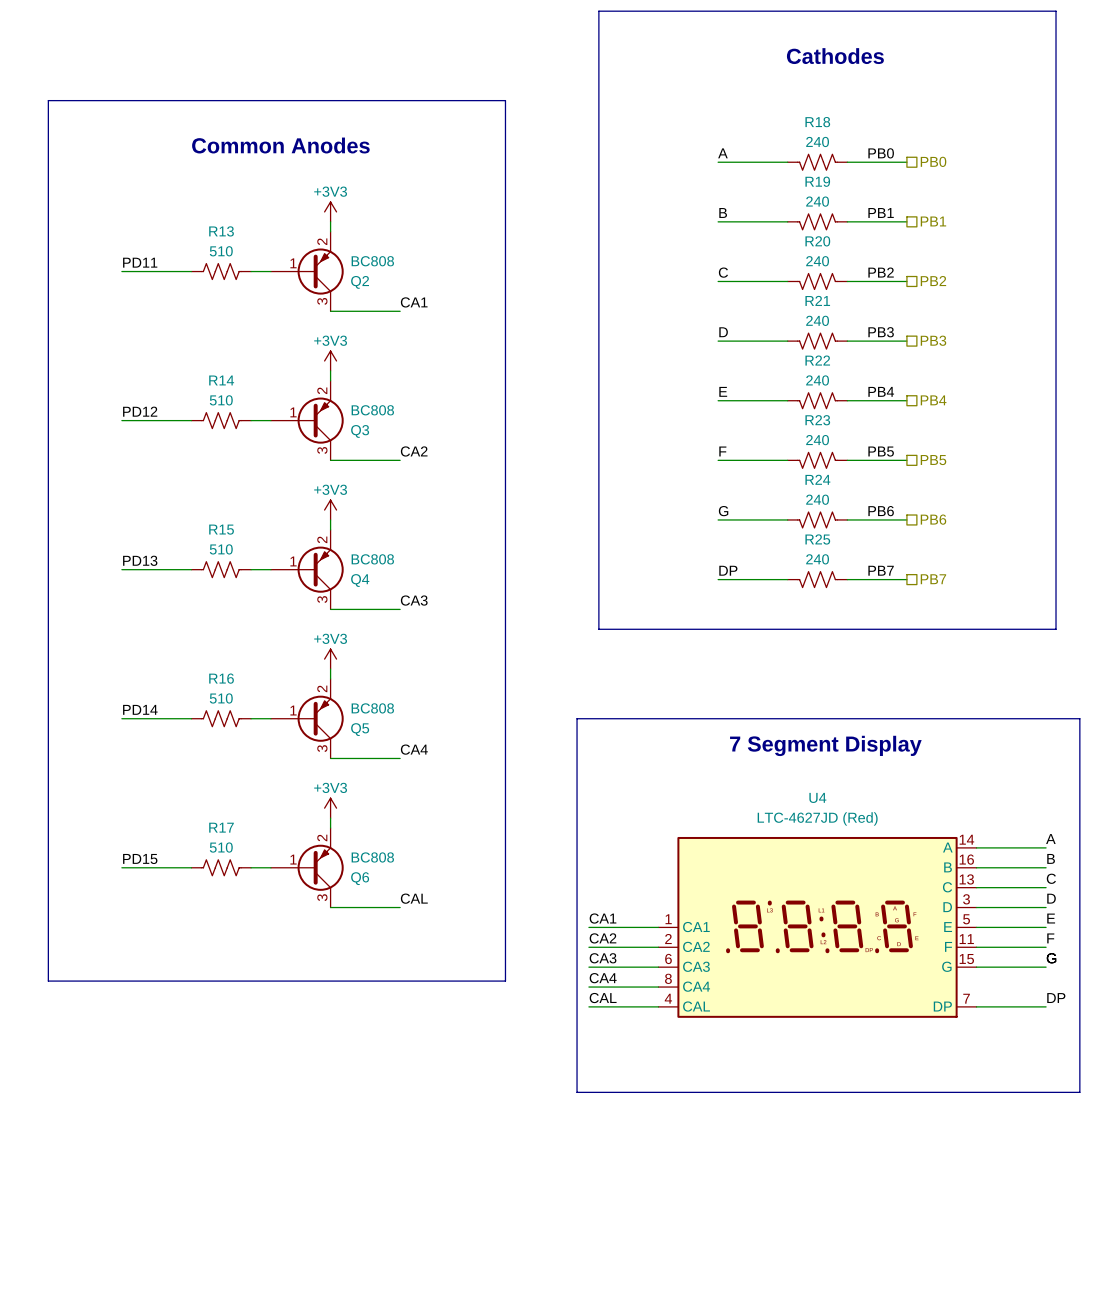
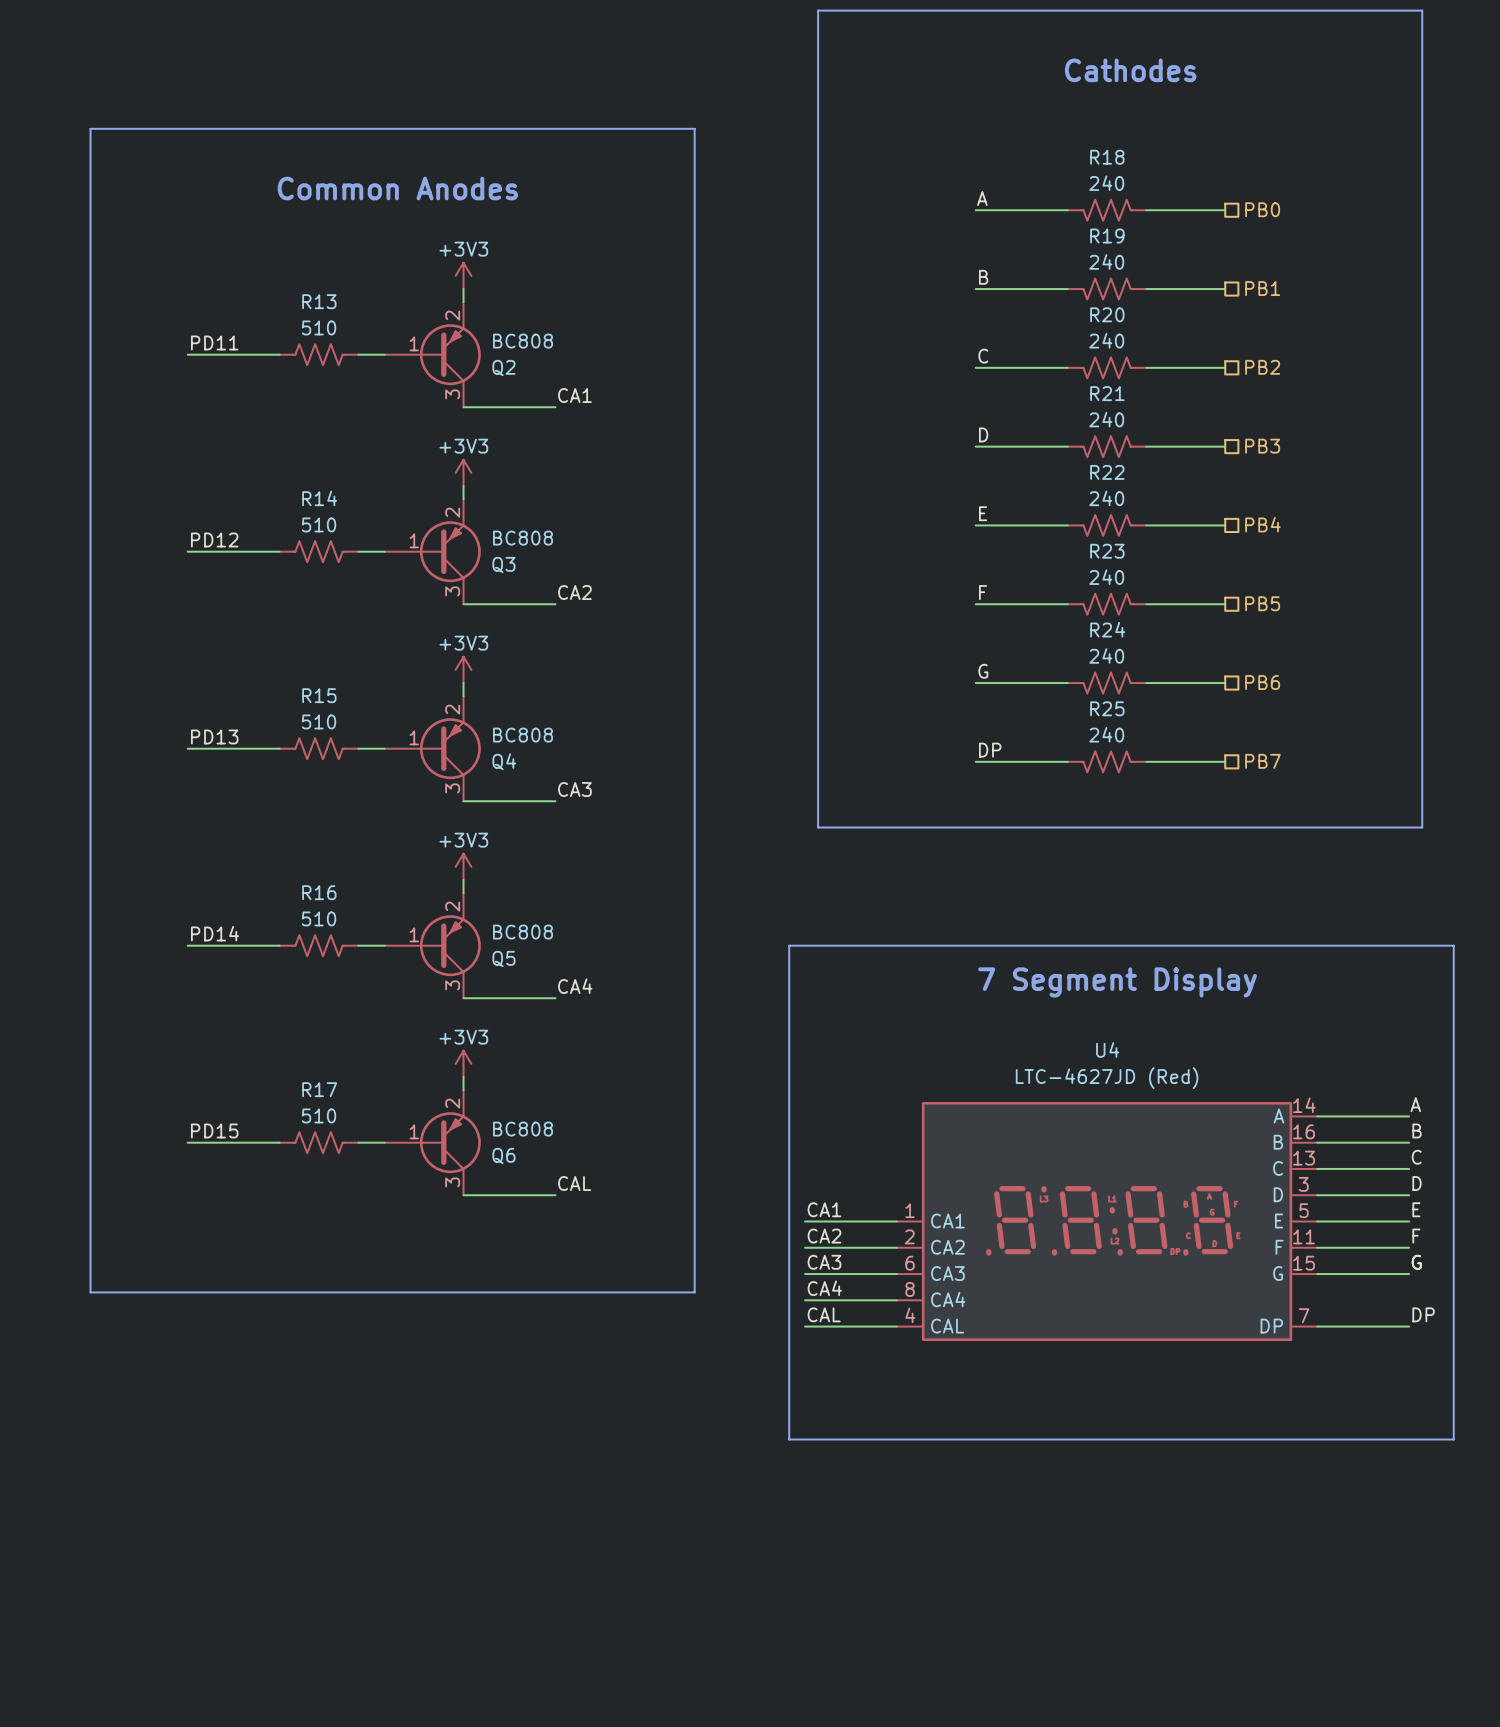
label: PB0 (881, 153) -> none
label: PB1 (881, 212) -> none
label: PB2 (881, 272) -> none
label: PB3 (881, 332) -> none
label: PB4 (881, 391) -> none
label: PB5 (881, 451) -> none
label: PB6 (881, 511) -> none
label: PB7 (881, 570) -> none

